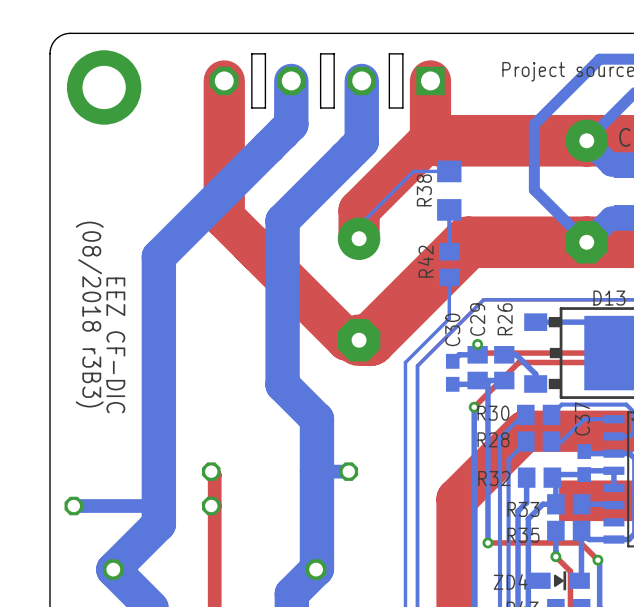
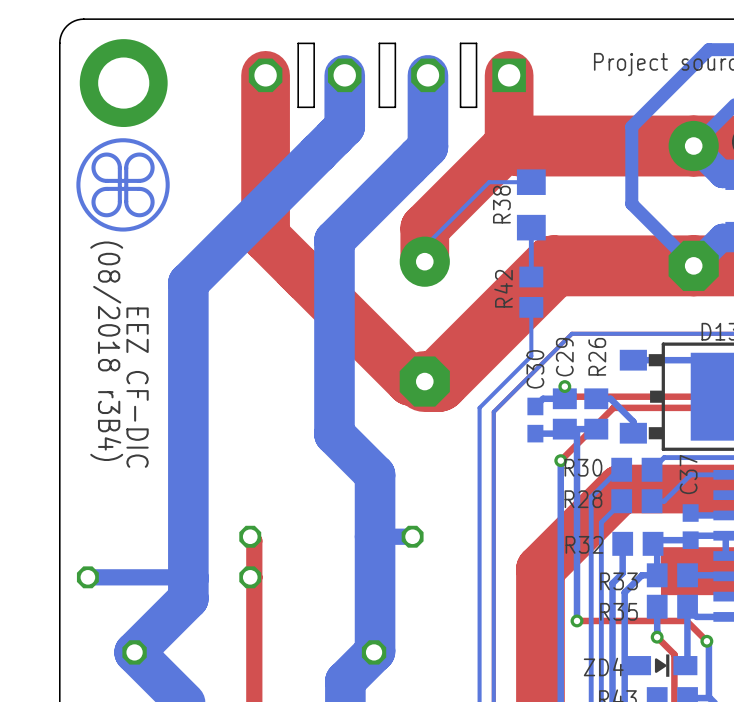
drawing: none -> [76, 138, 170, 232]
text: (08/2018 r3B3) (89, 314) -> (08/2018 r3B4) (106, 351)

